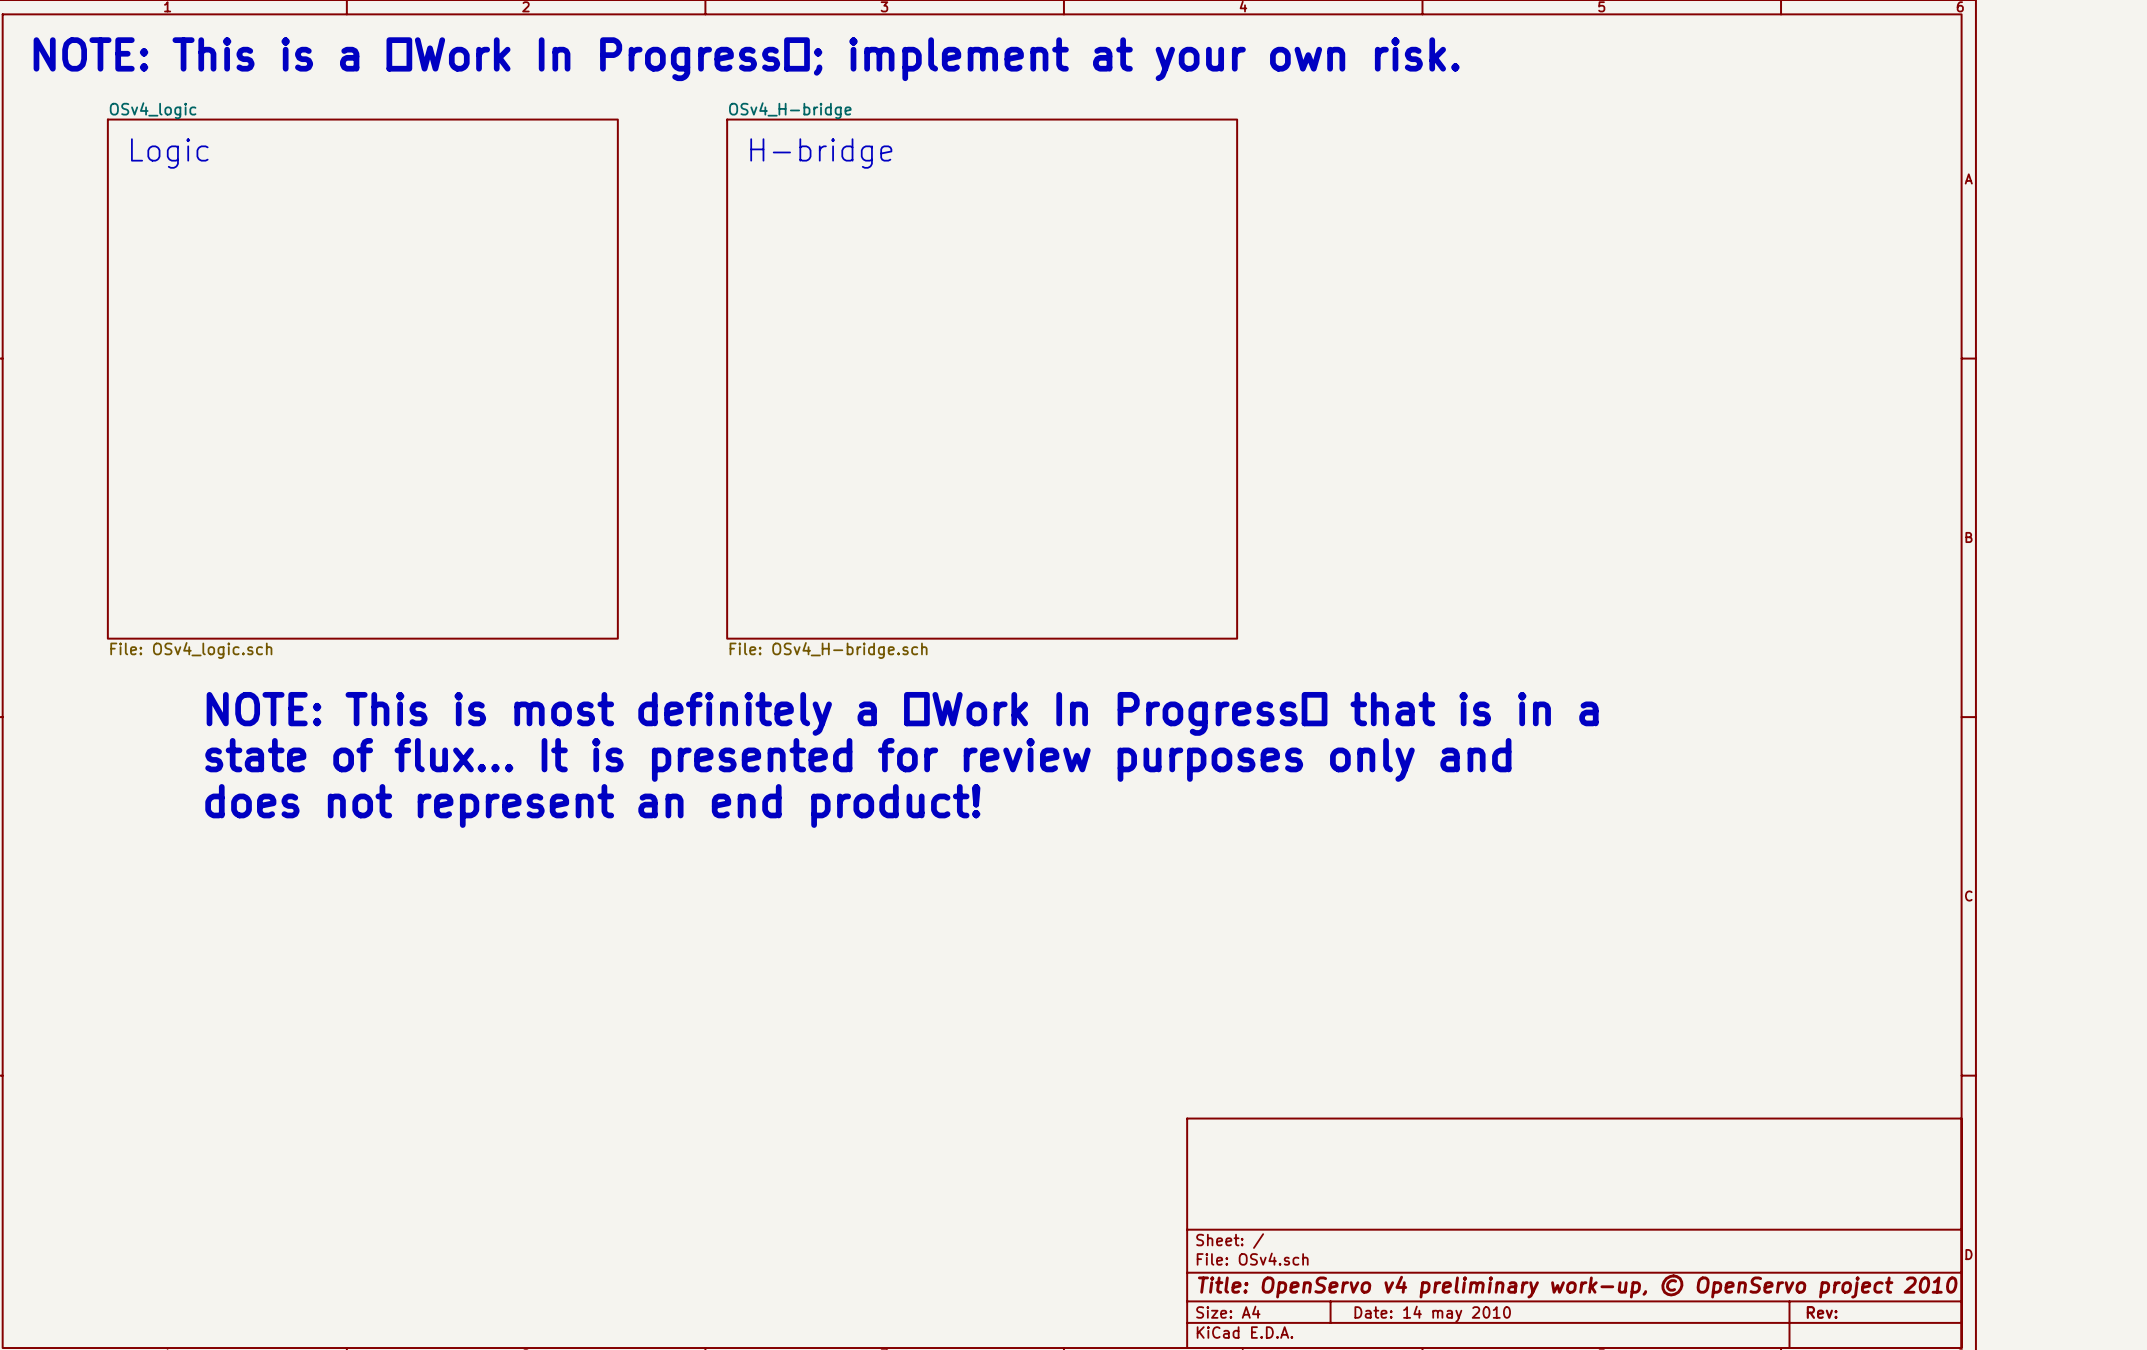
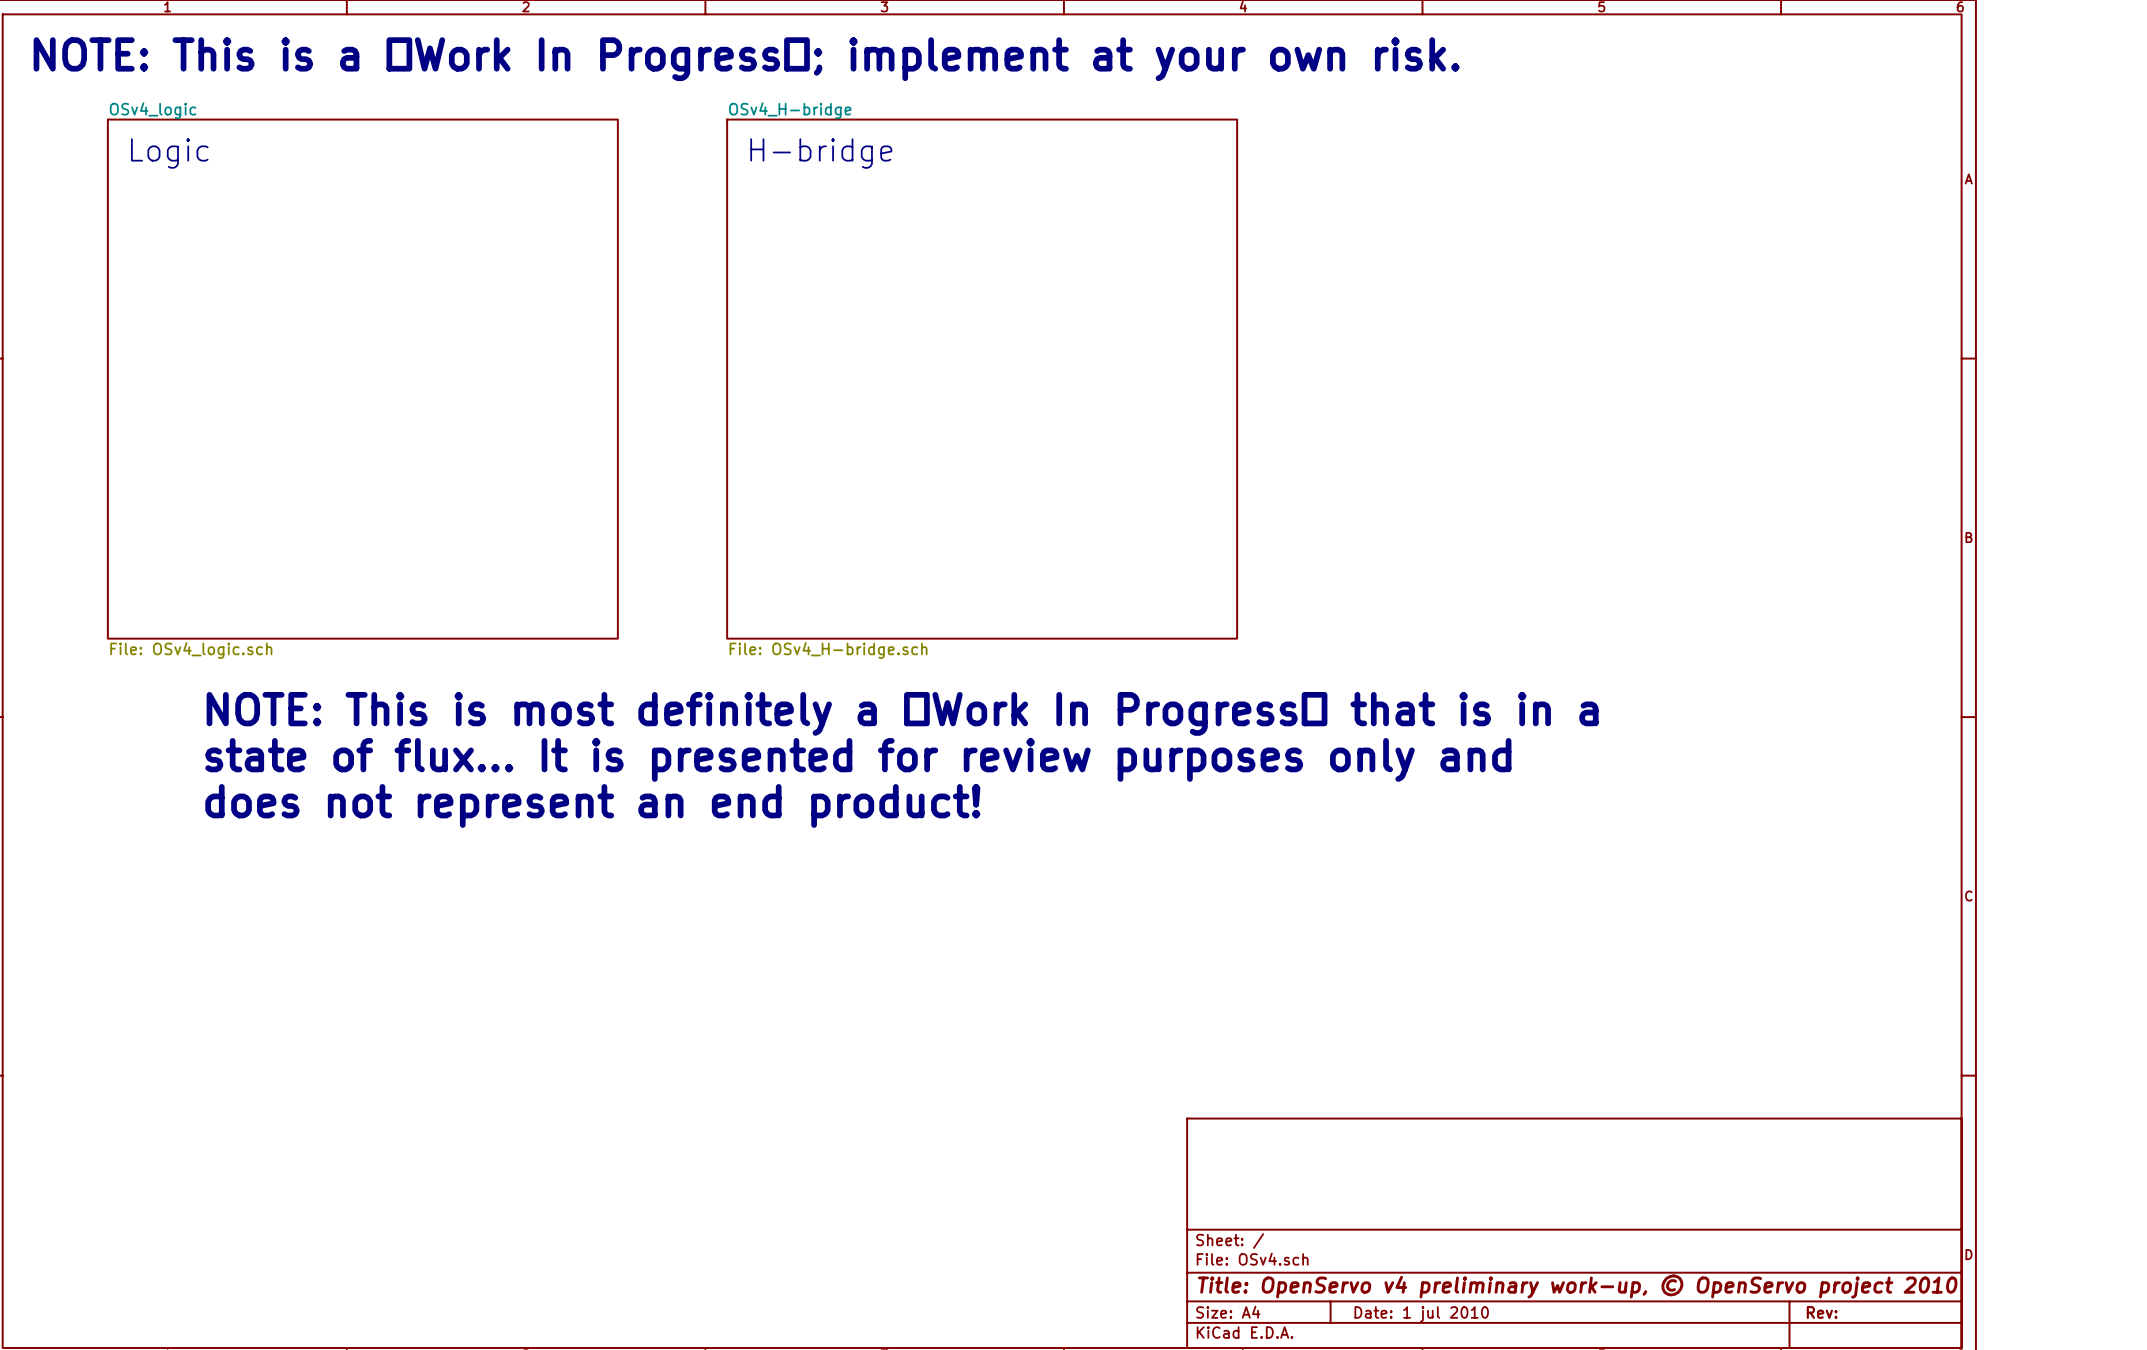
title block: Date: 14 may 2010 (1432, 1314) -> Date: 1 jul 2010 (1421, 1314)

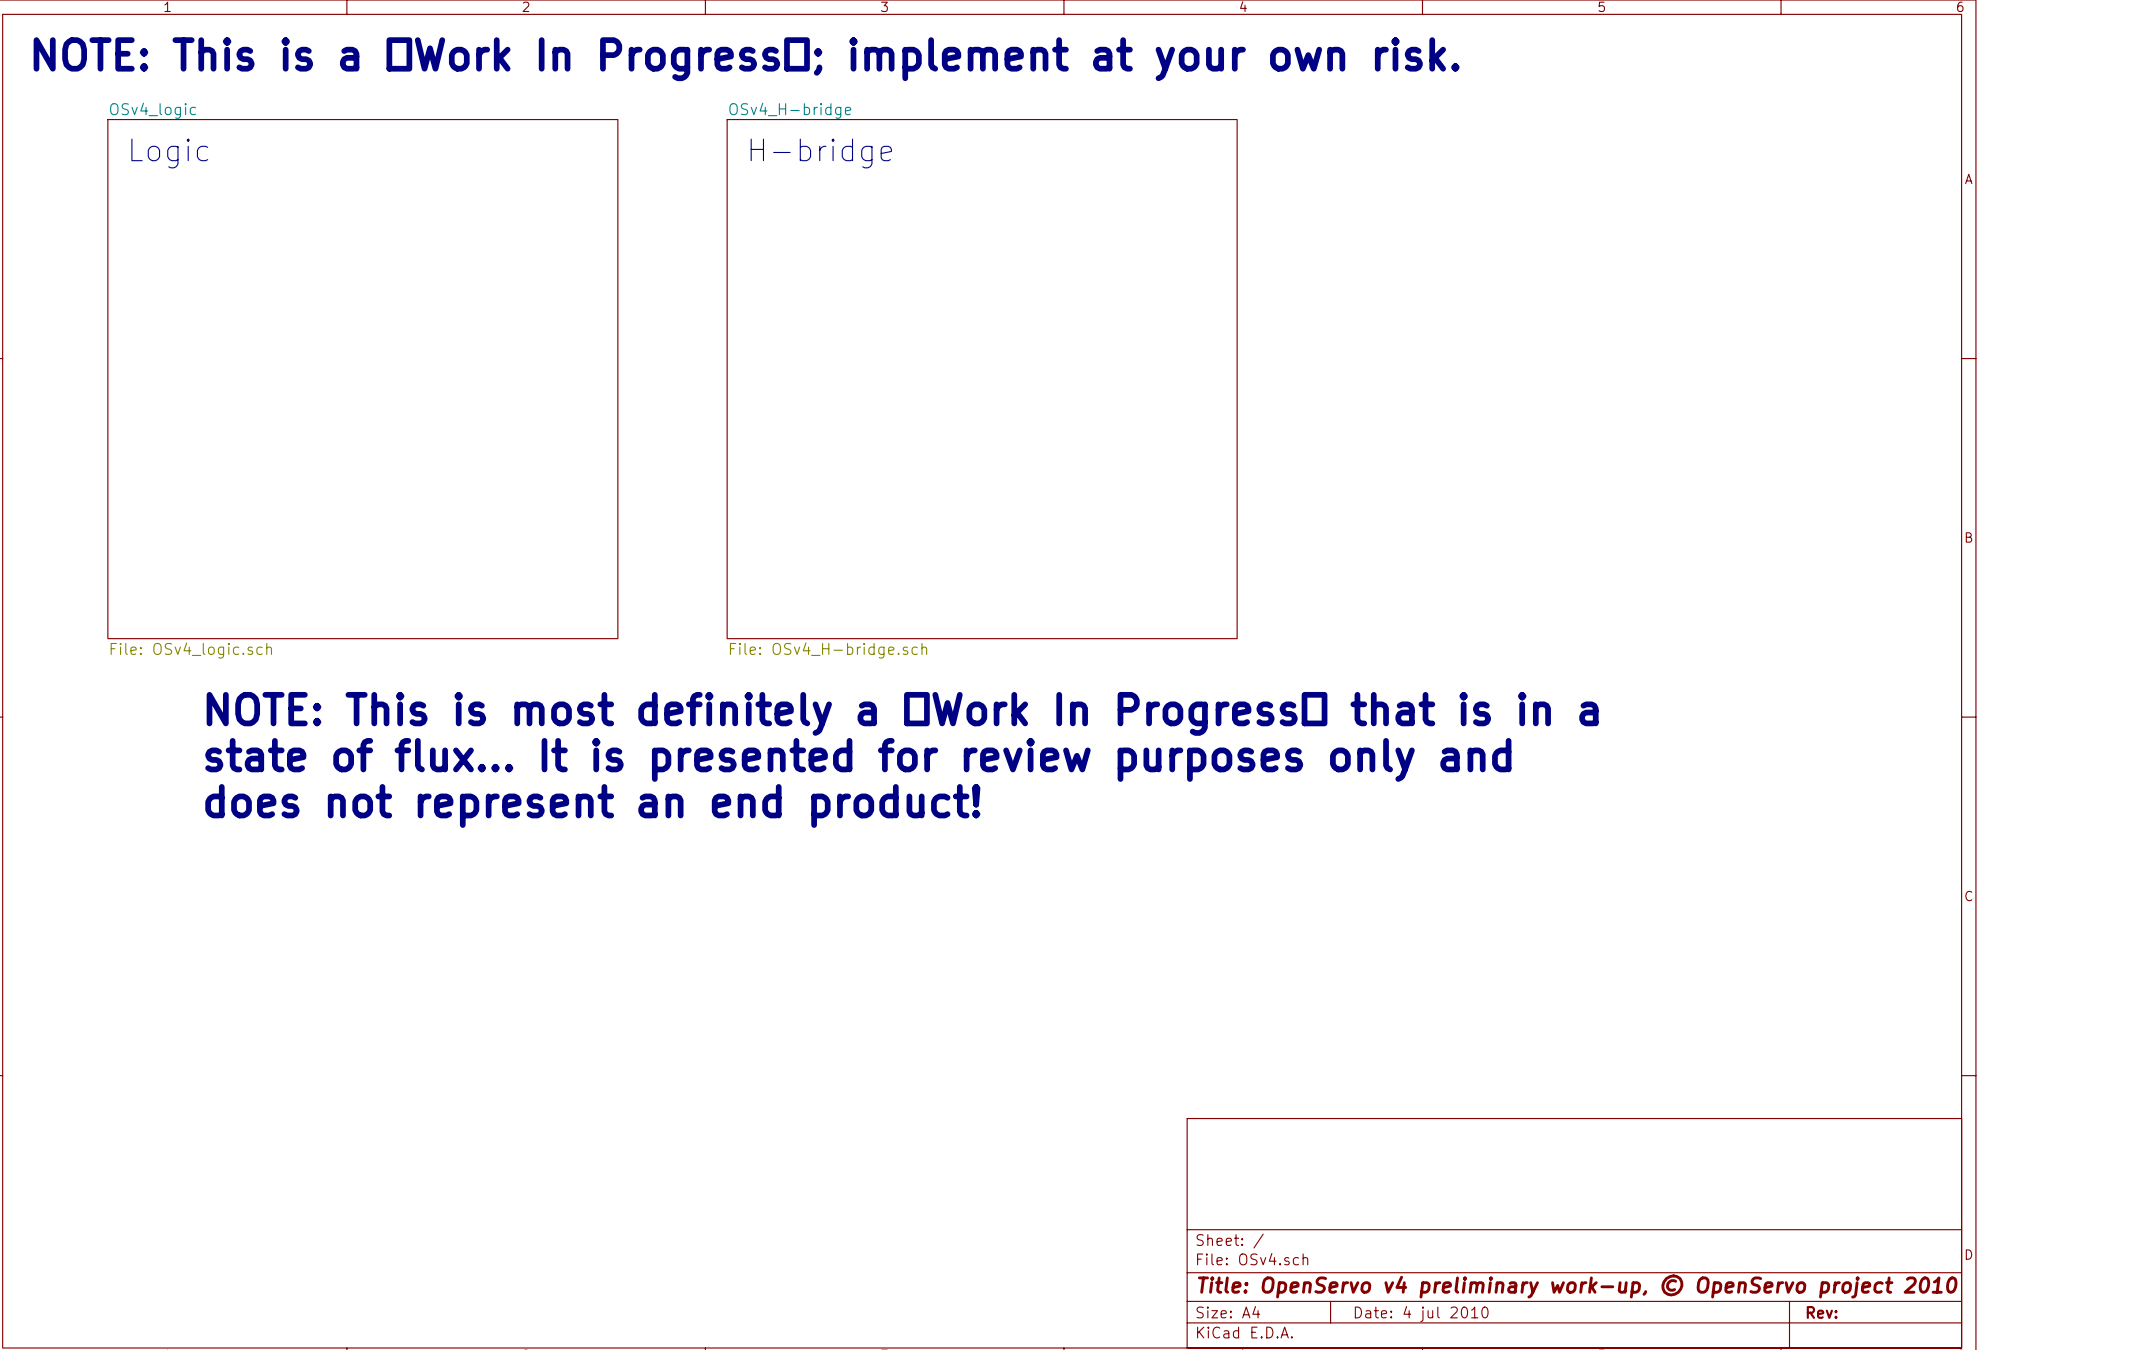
title block: Date: 1 jul 2010 (1421, 1314) -> Date: 4 jul 2010 (1421, 1314)

